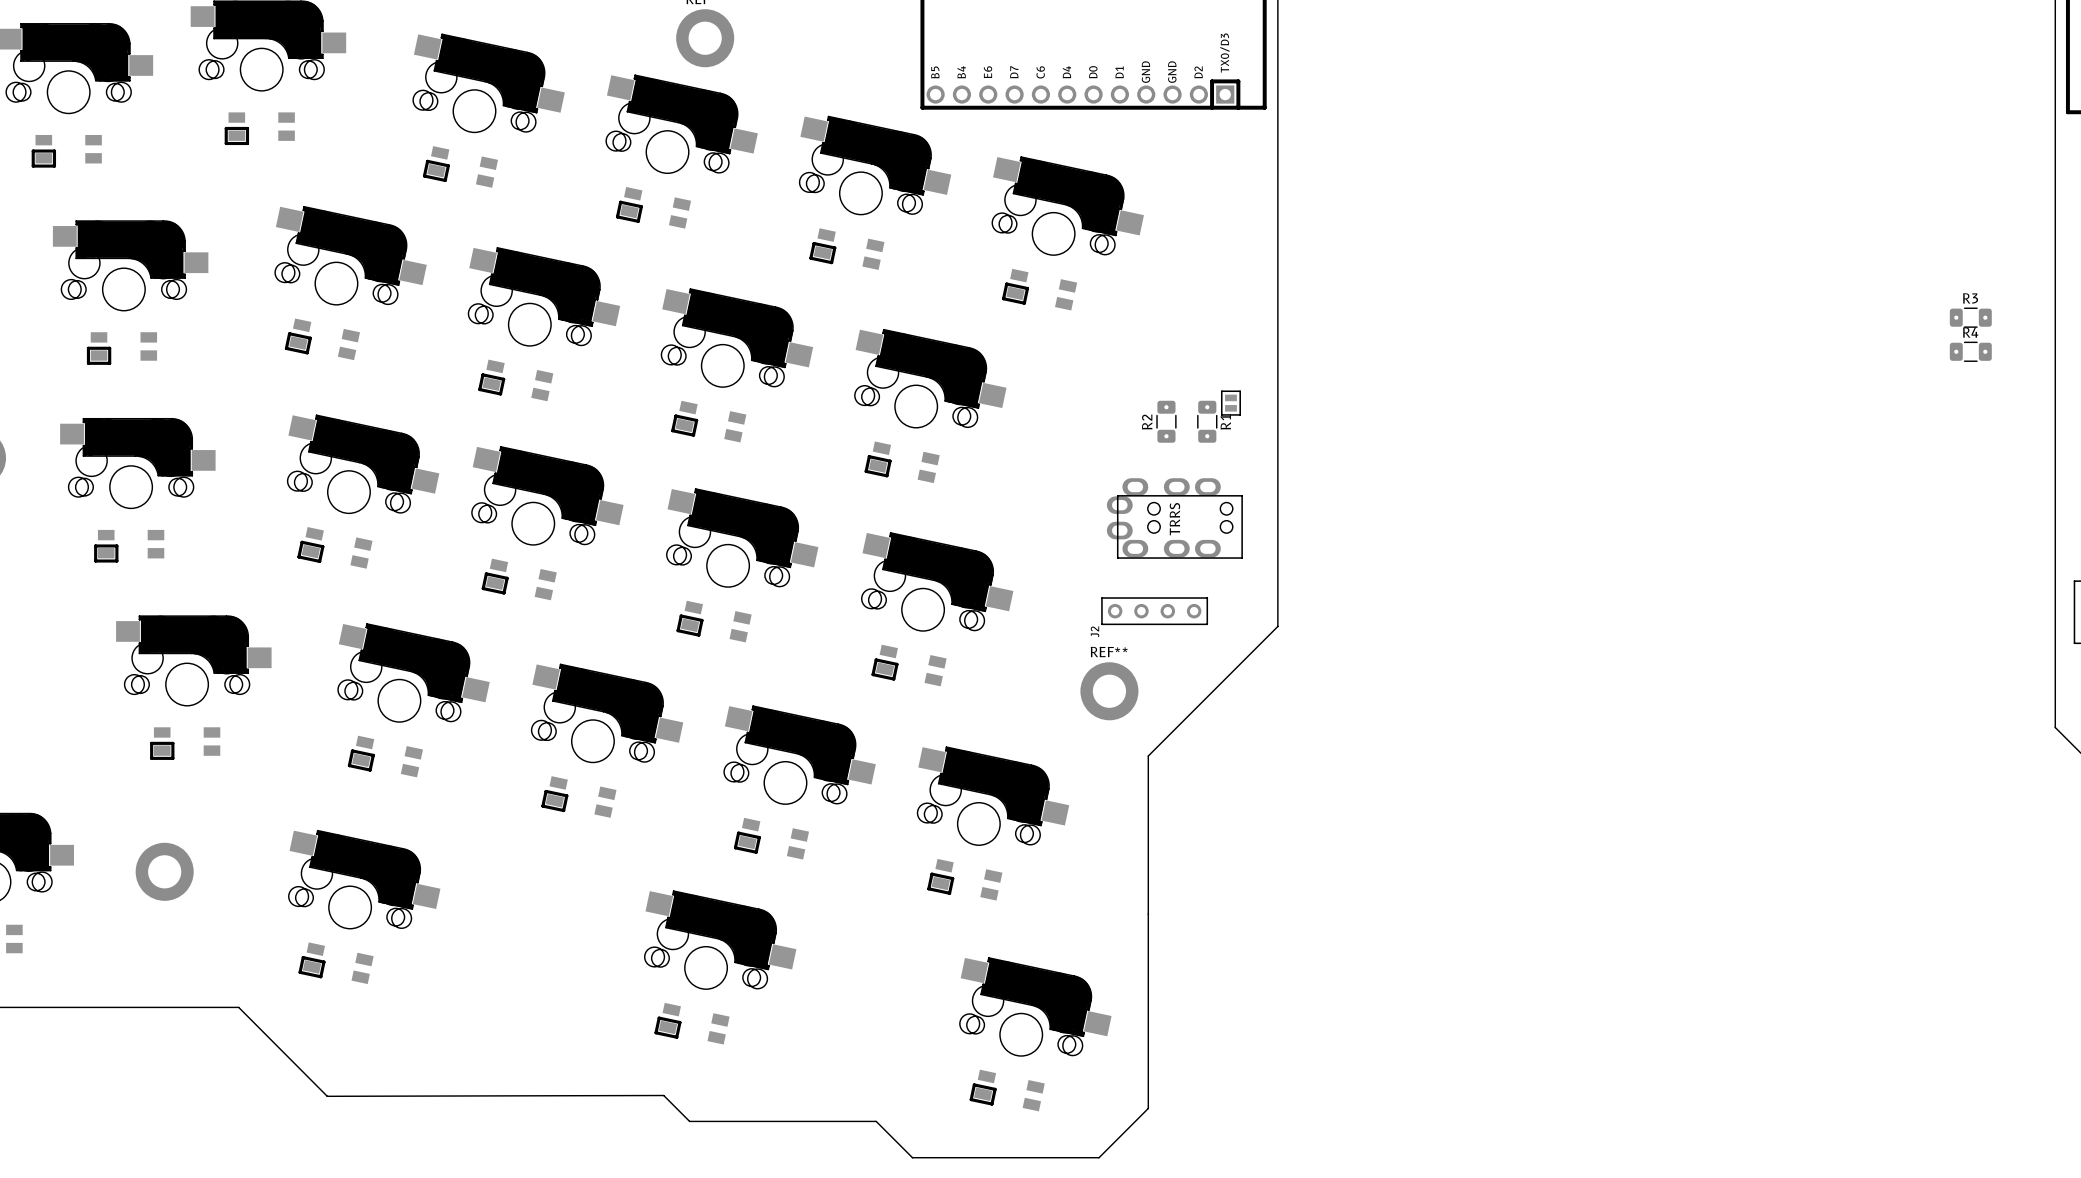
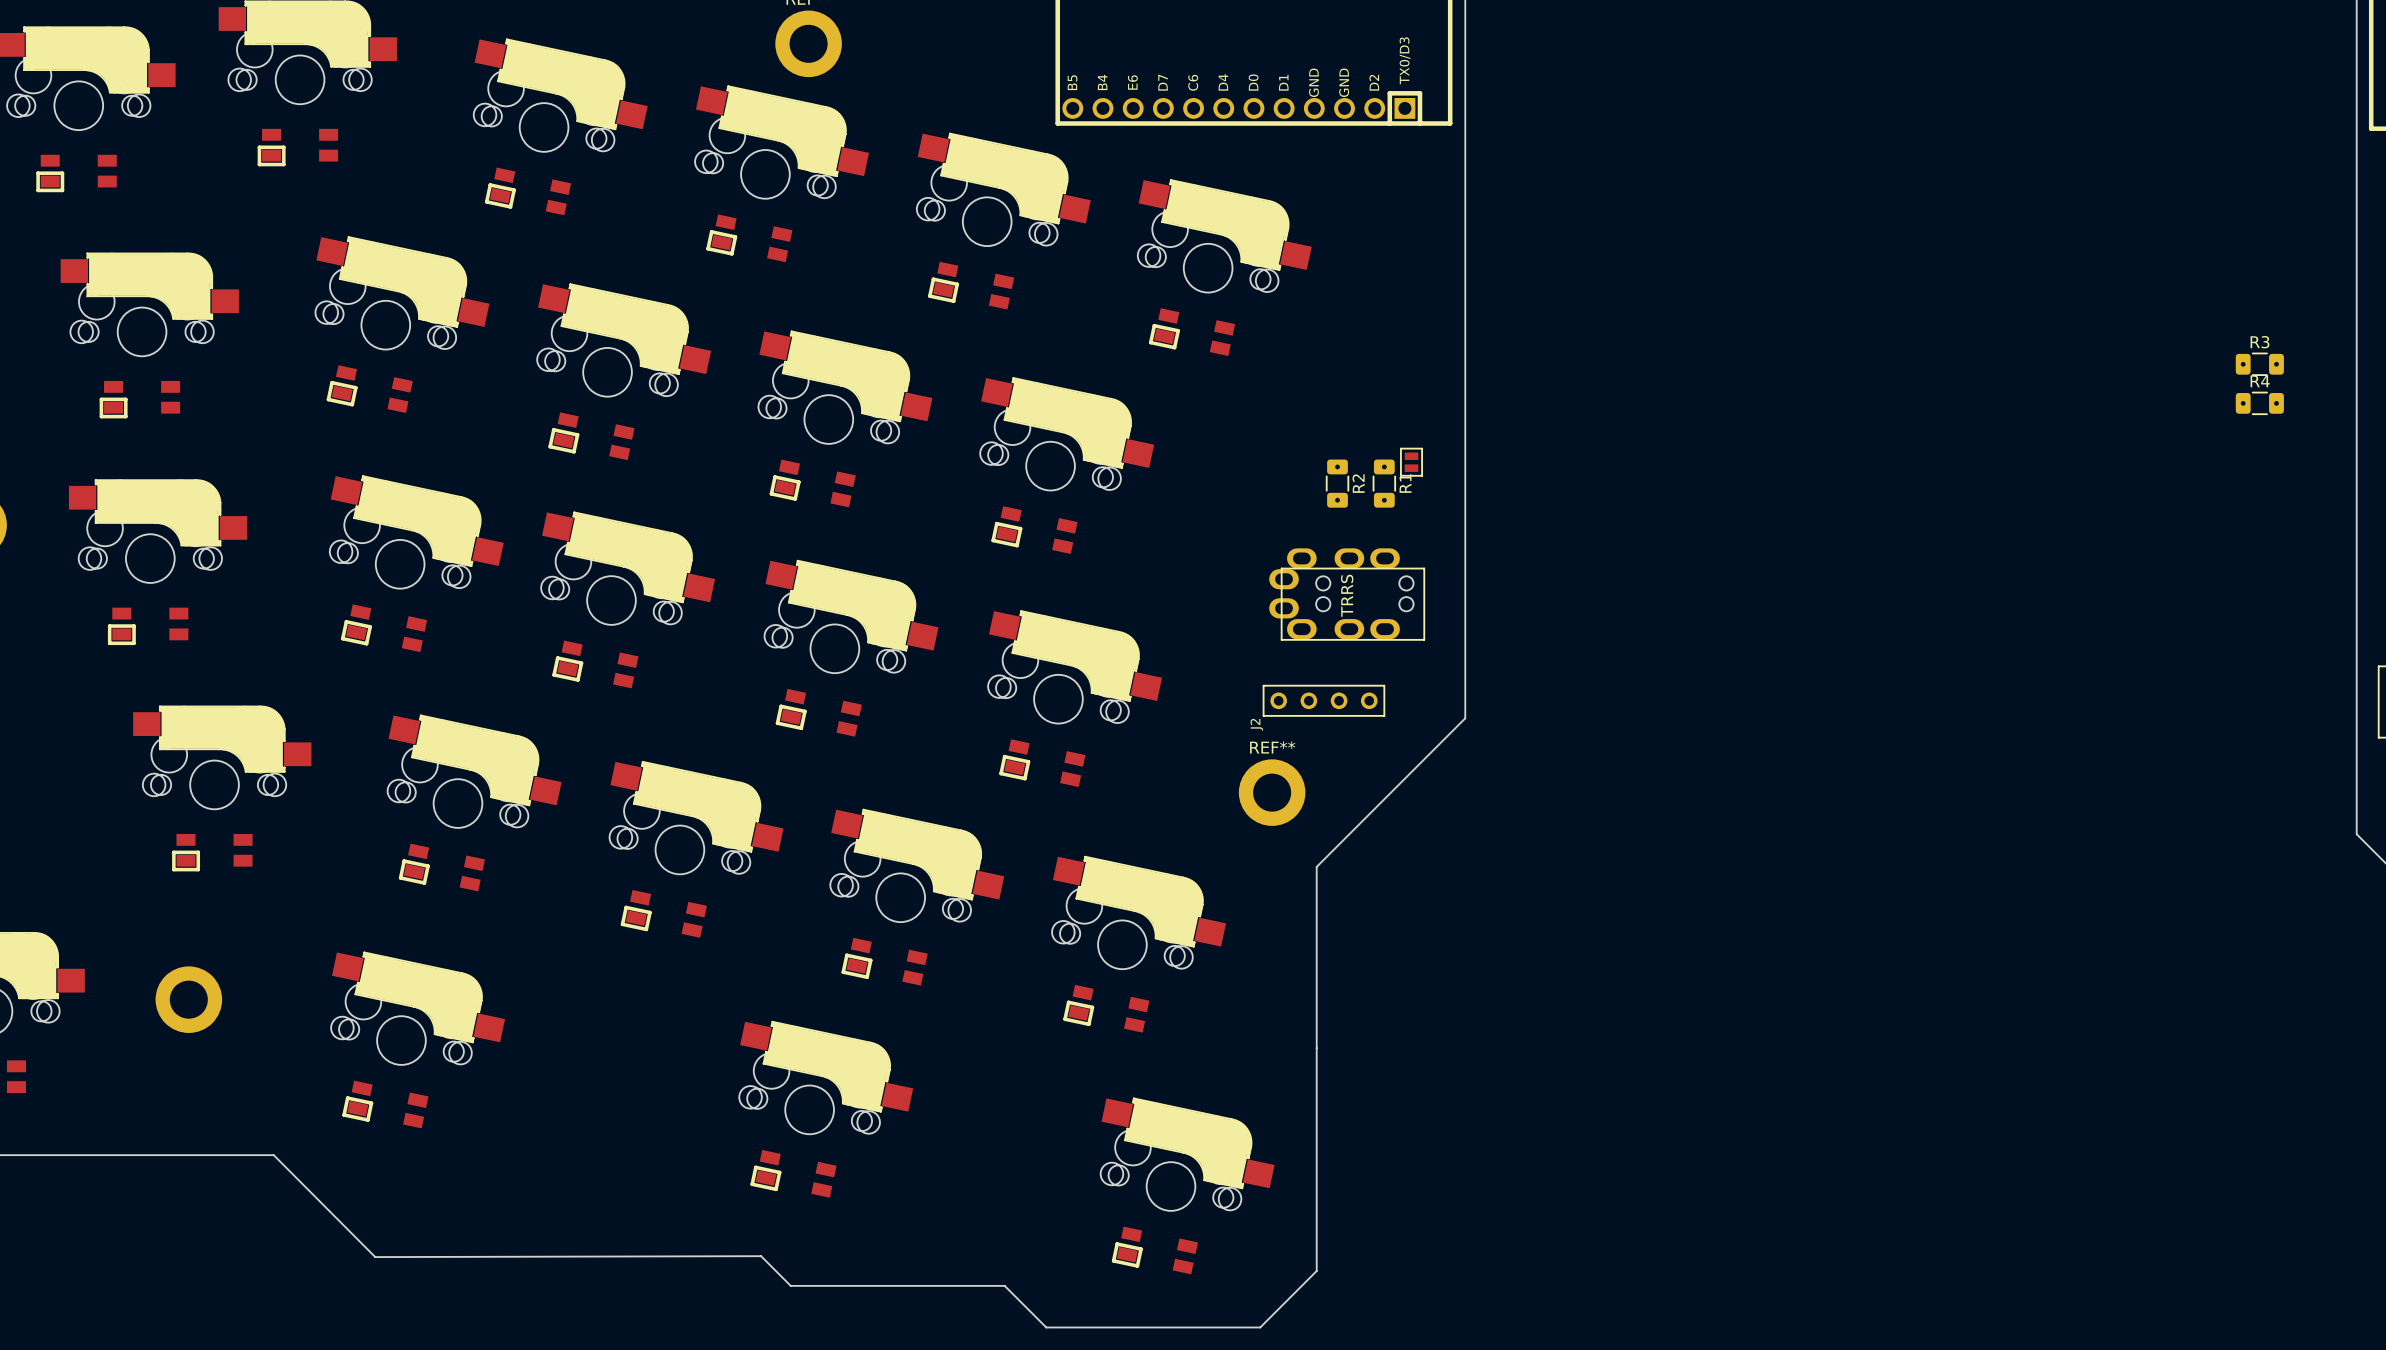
R2 name position: R2 (1147, 422) -> R2 (1358, 483)

